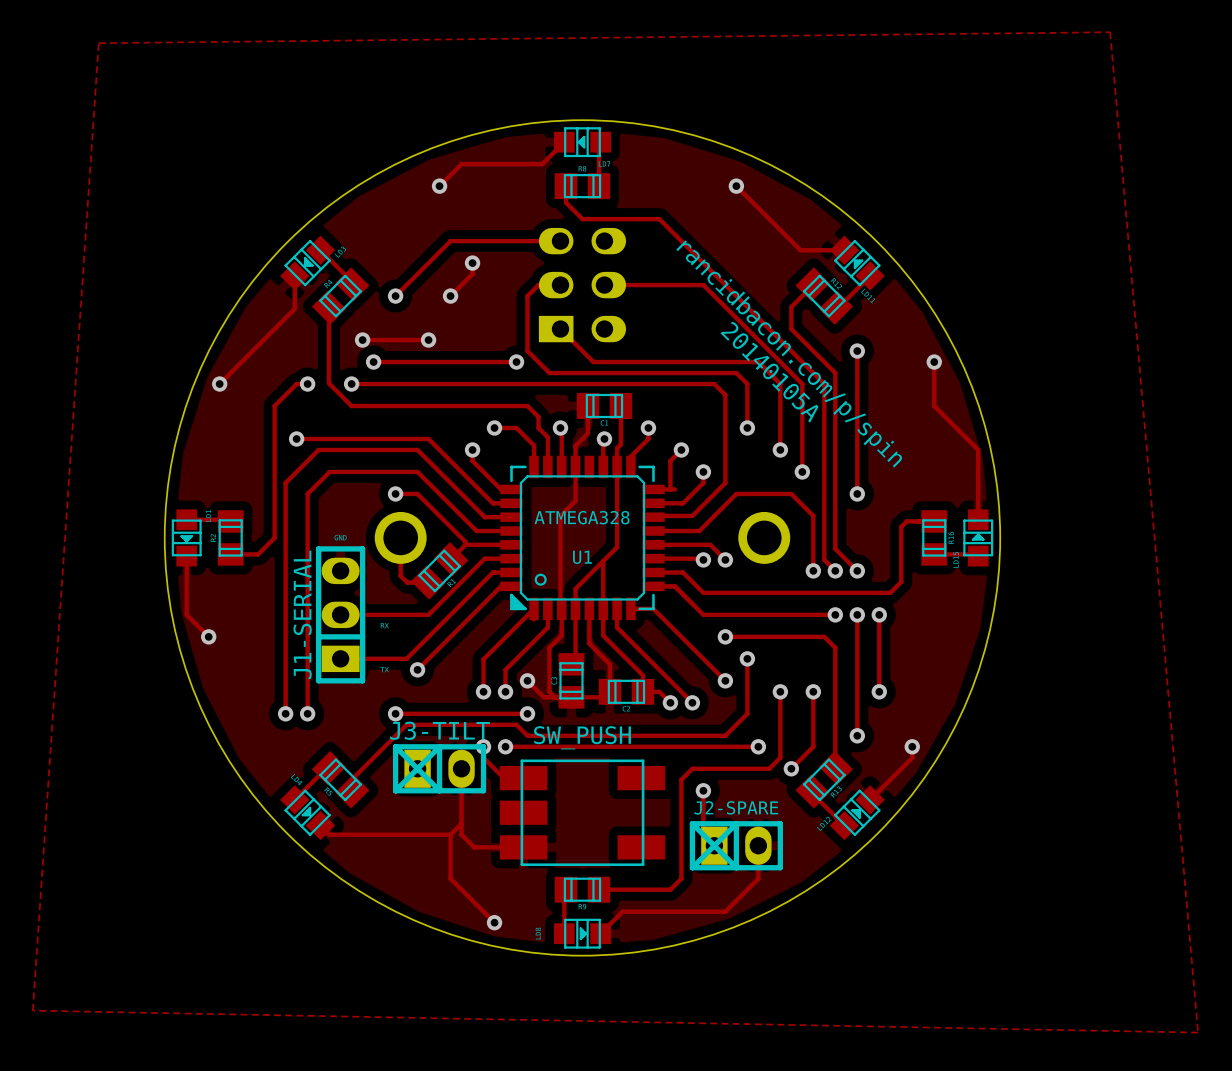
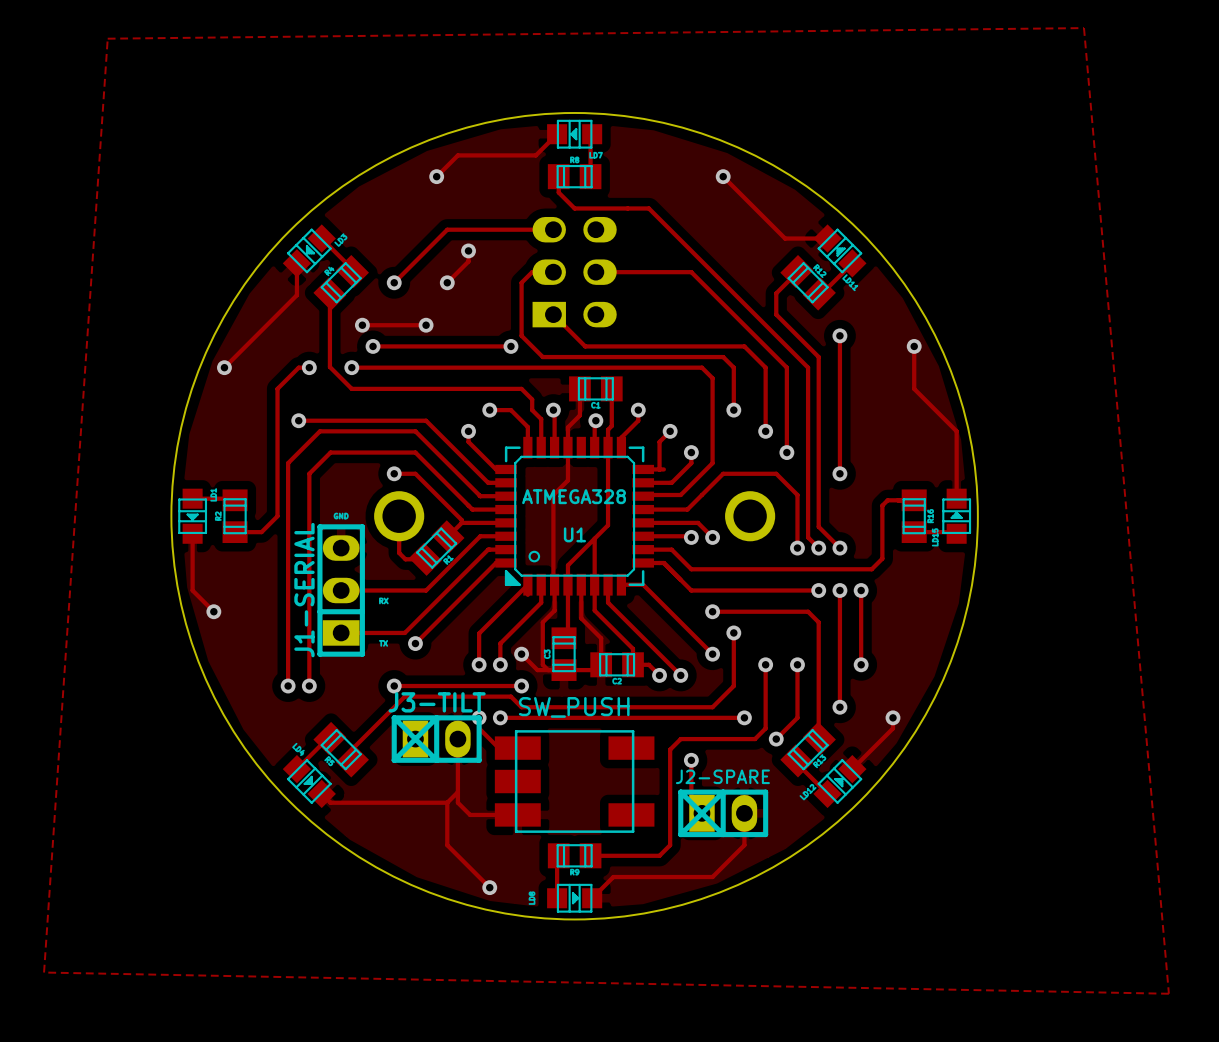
text: rancidbacon.com/p/spin (789, 353) -> none
text: 20140105A (769, 372) -> none

